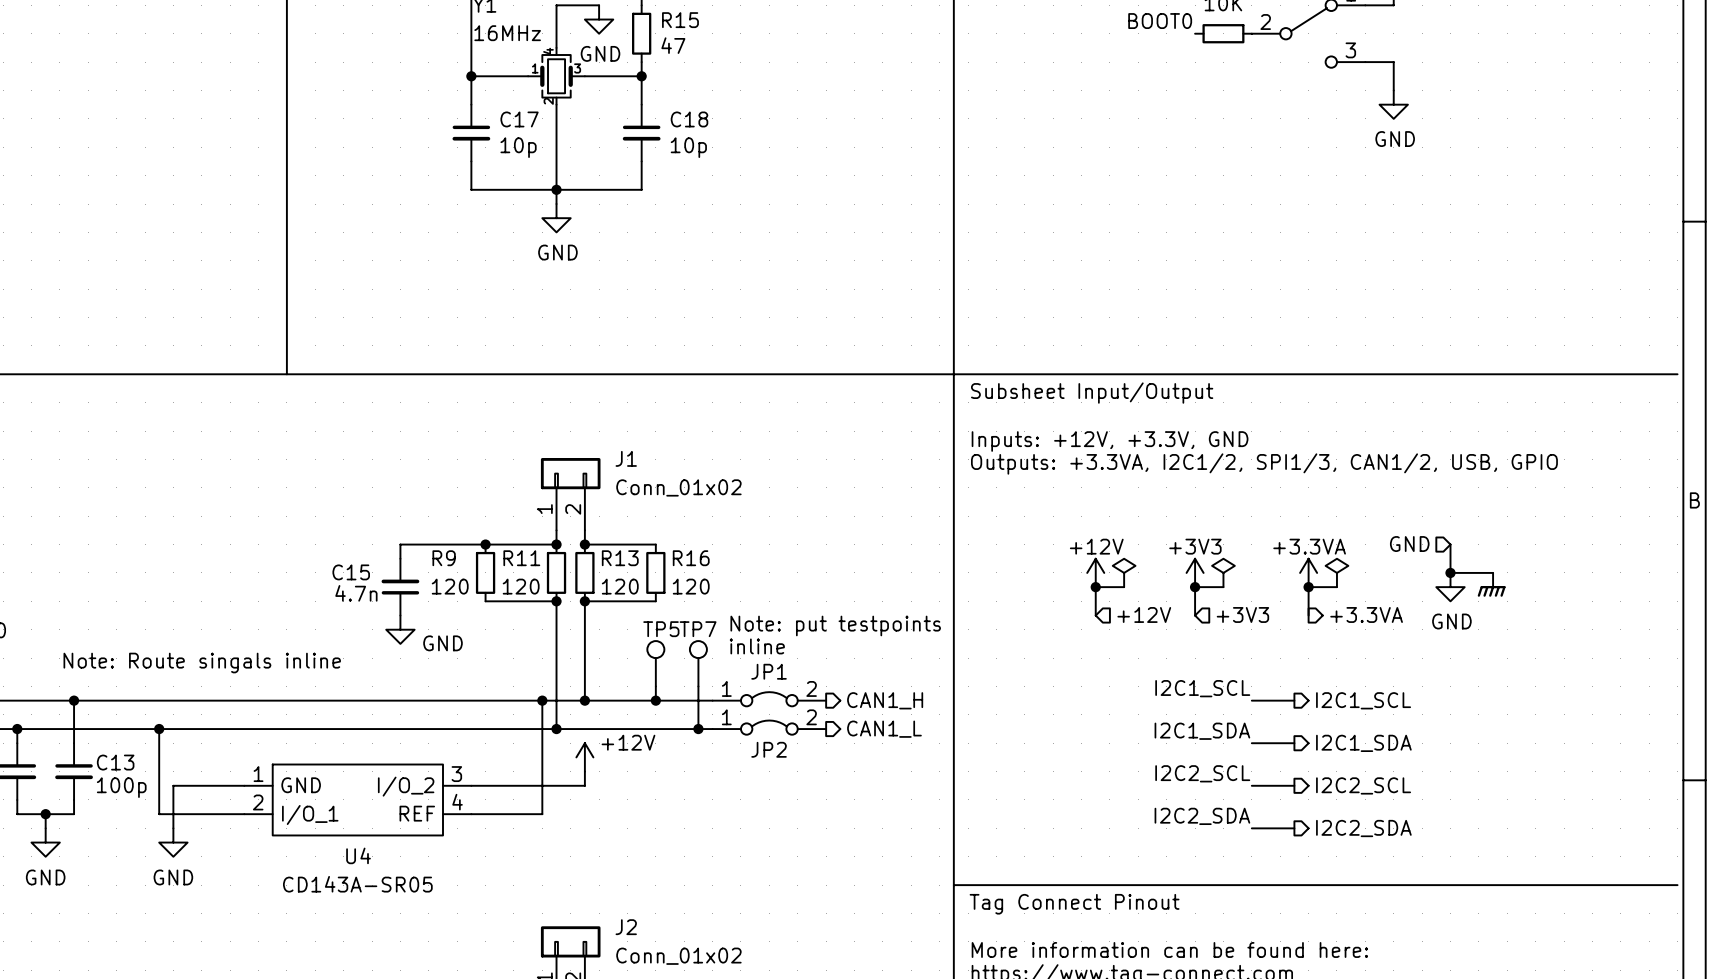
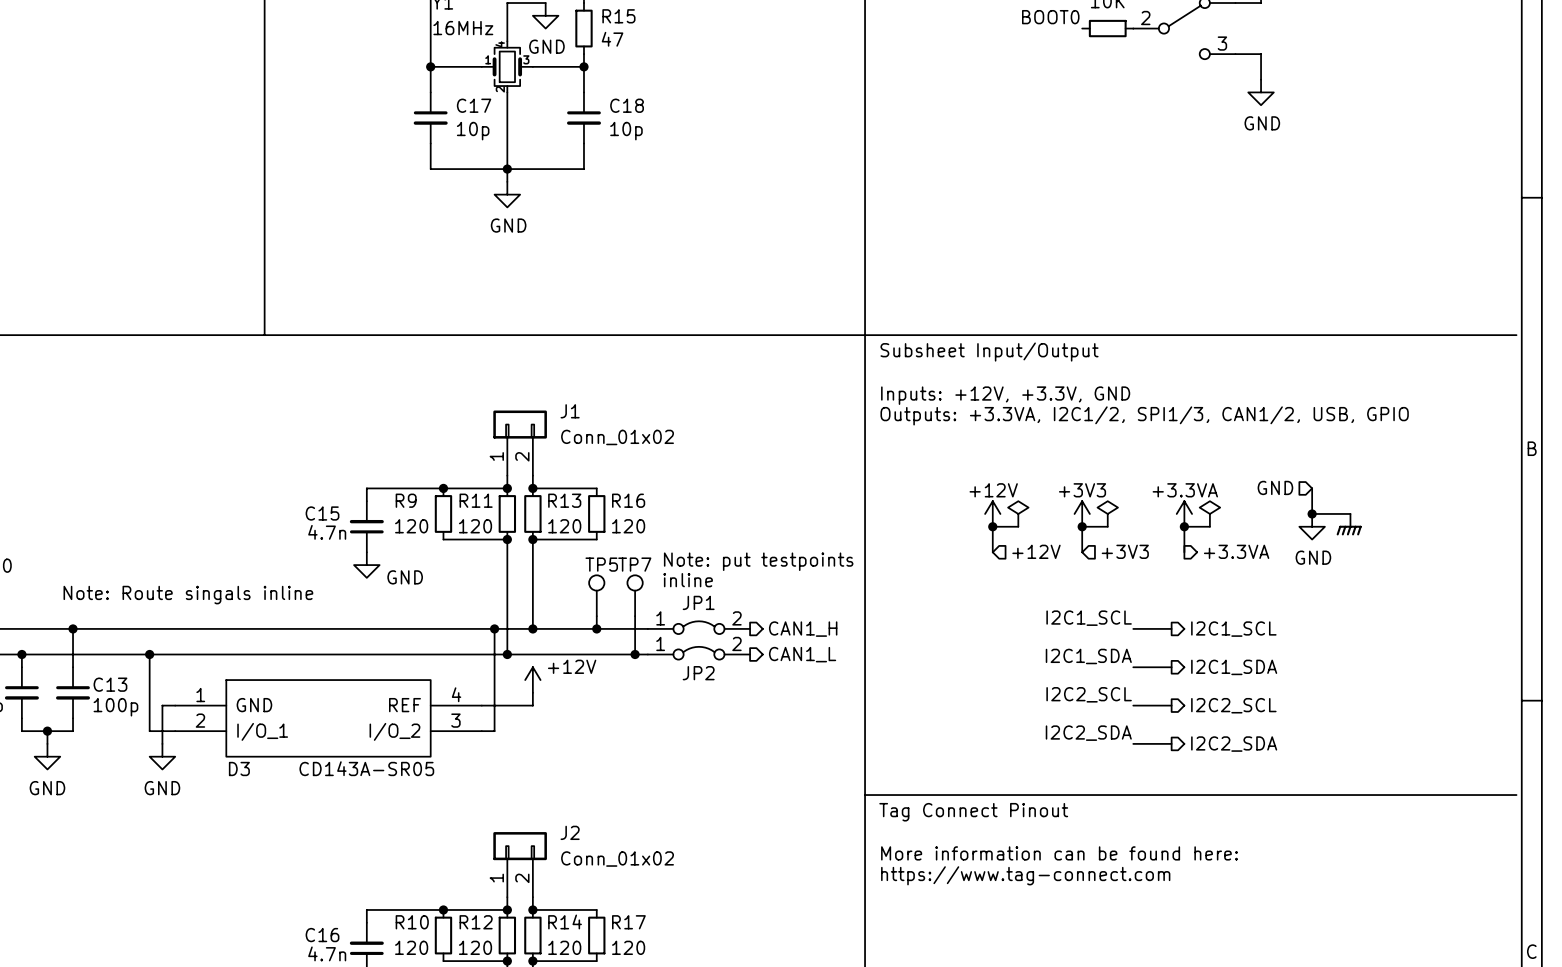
U4: CD143A-SR05 (357, 799) -> none
D3: none -> CD143A-SR05 (328, 718)

